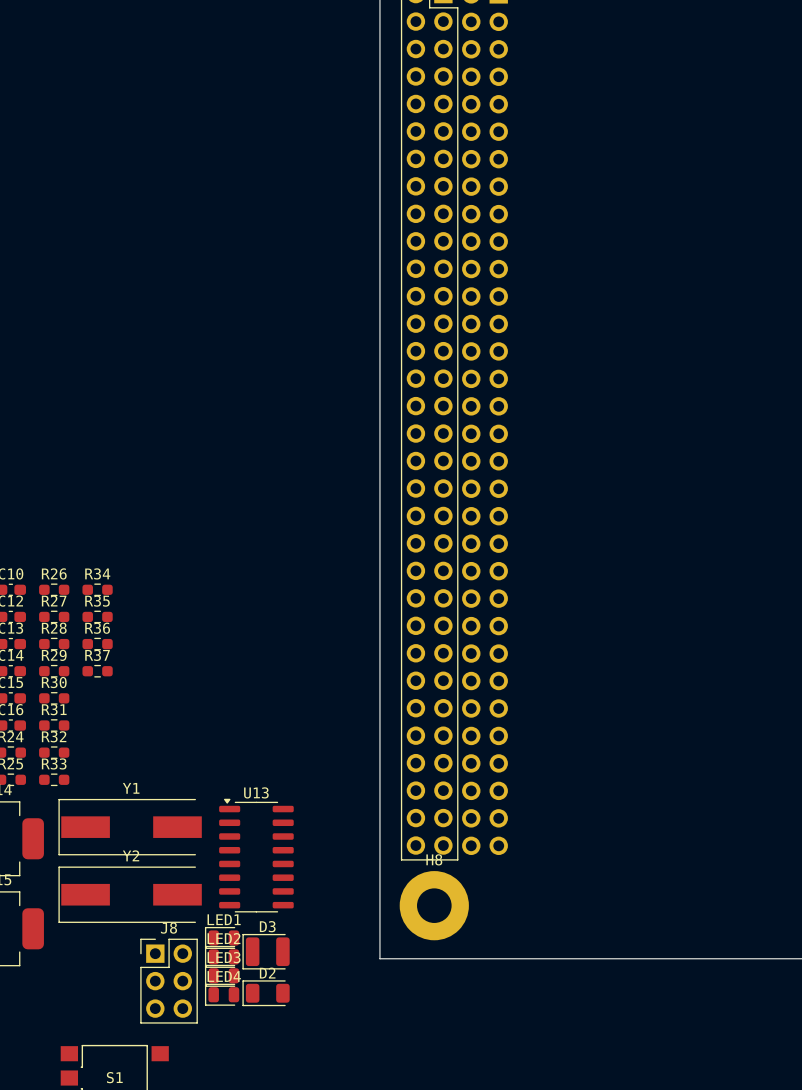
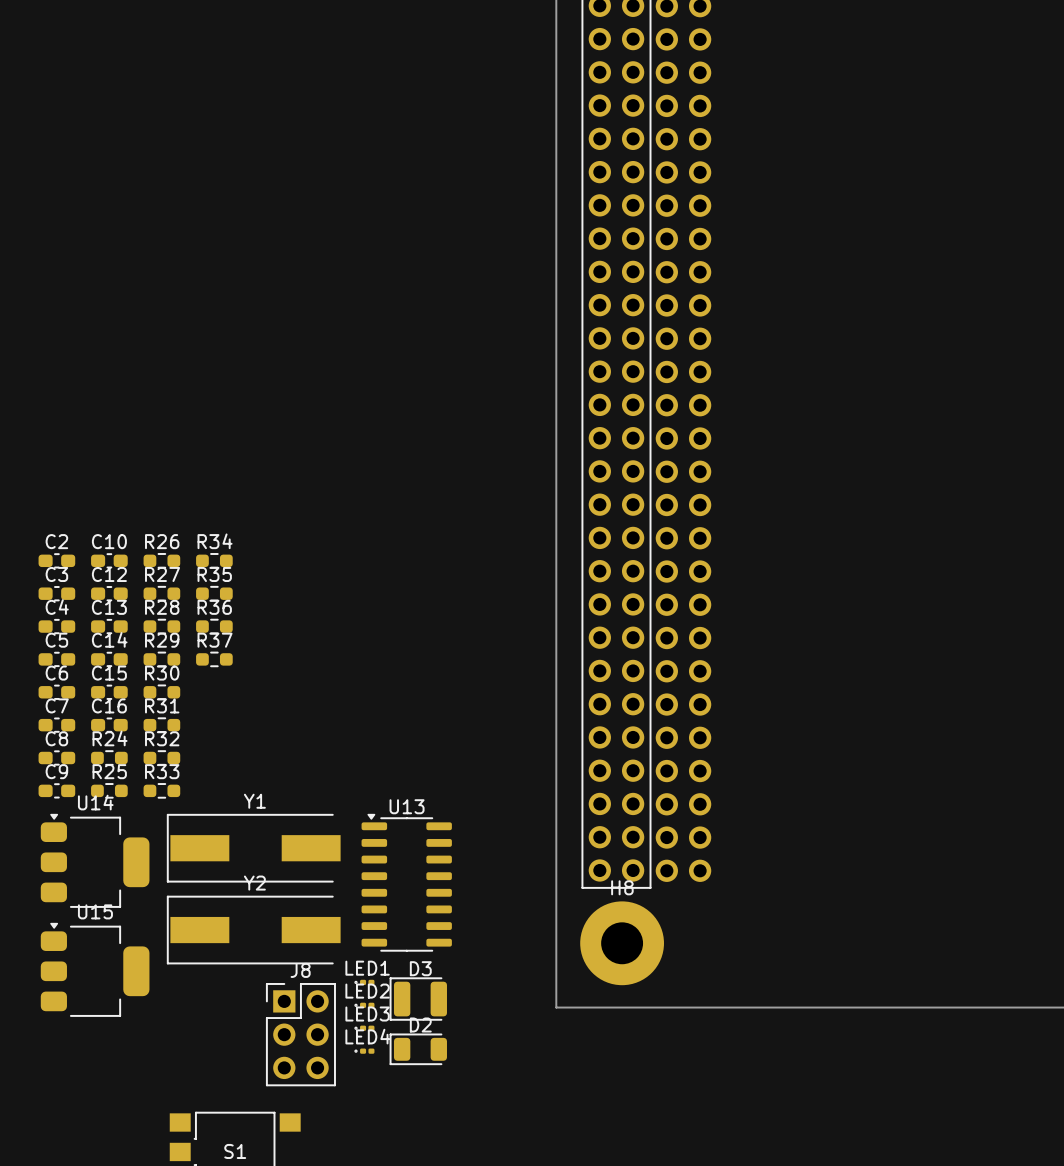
LED1 footprint: [204, 926, 240, 950] -> [354, 979, 375, 986]
LED2 footprint: [204, 945, 240, 968] -> [354, 1002, 375, 1008]
LED3 footprint: [204, 964, 240, 987] -> [354, 1025, 375, 1031]
LED4 footprint: [204, 983, 240, 1006] -> [354, 1048, 375, 1054]

